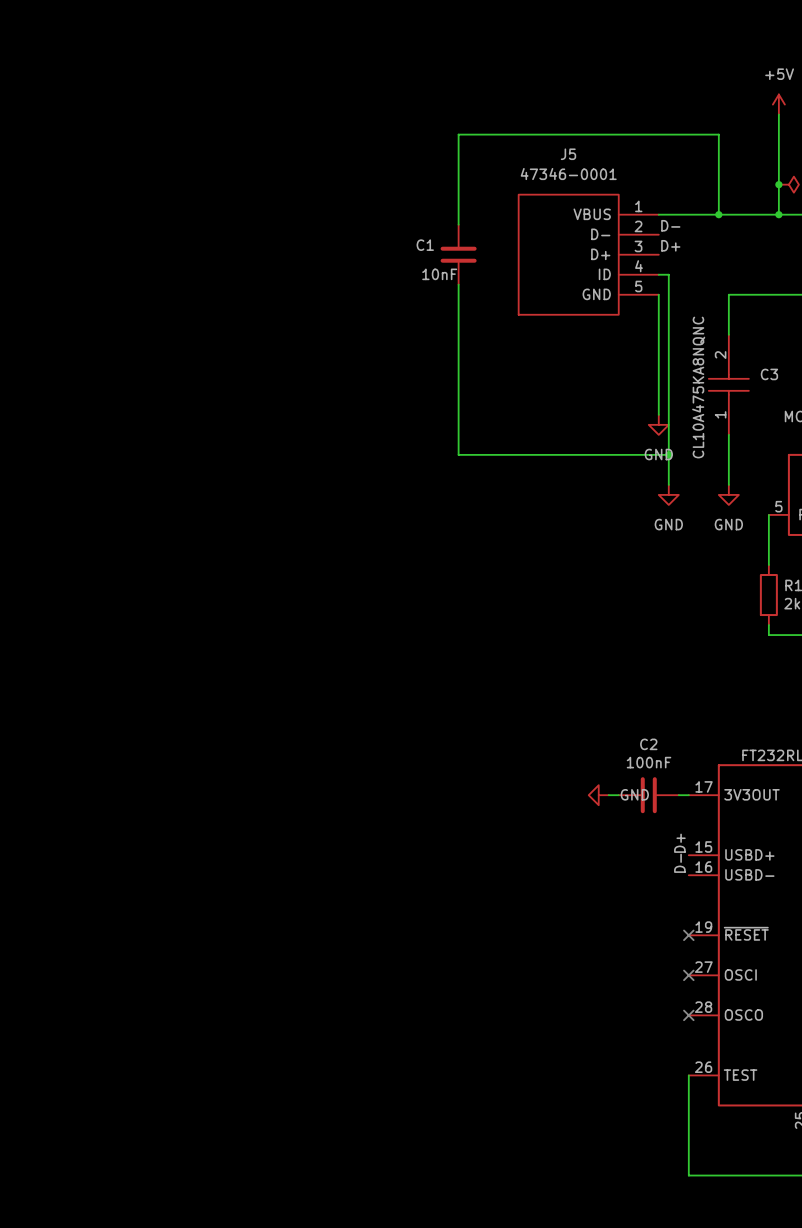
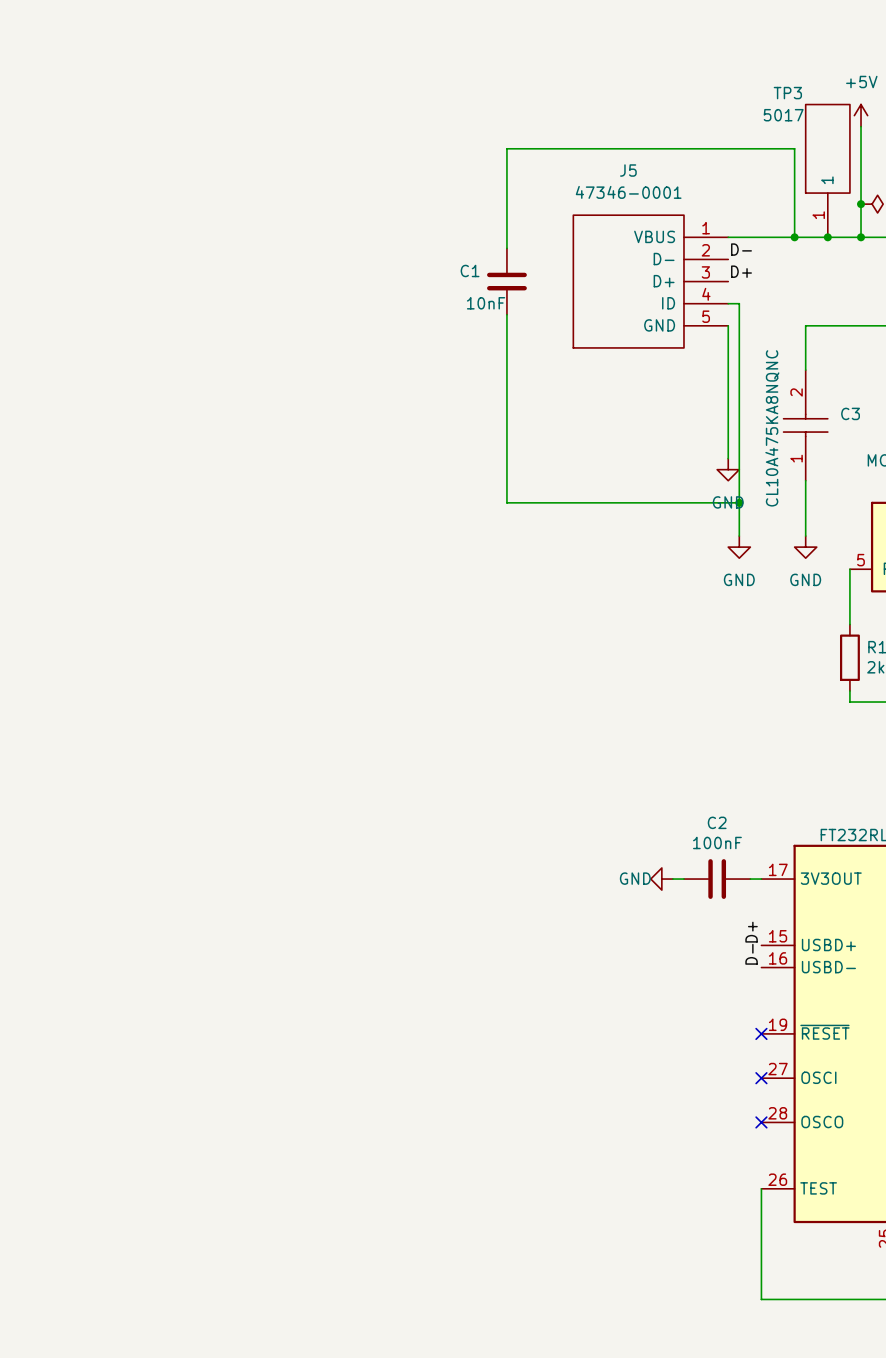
TP3: none -> 5017 (827, 170)
junction: none -> (827, 237)
power symbol text position: GND (634, 794) -> GND (635, 878)

